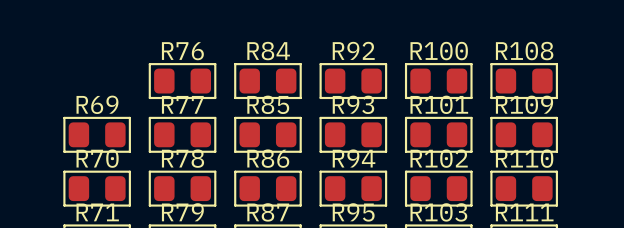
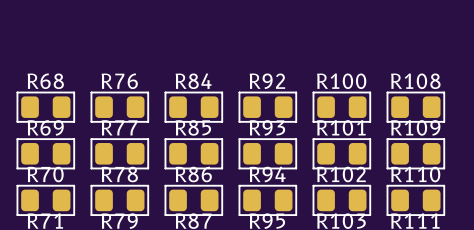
R68: none -> (45, 107)

